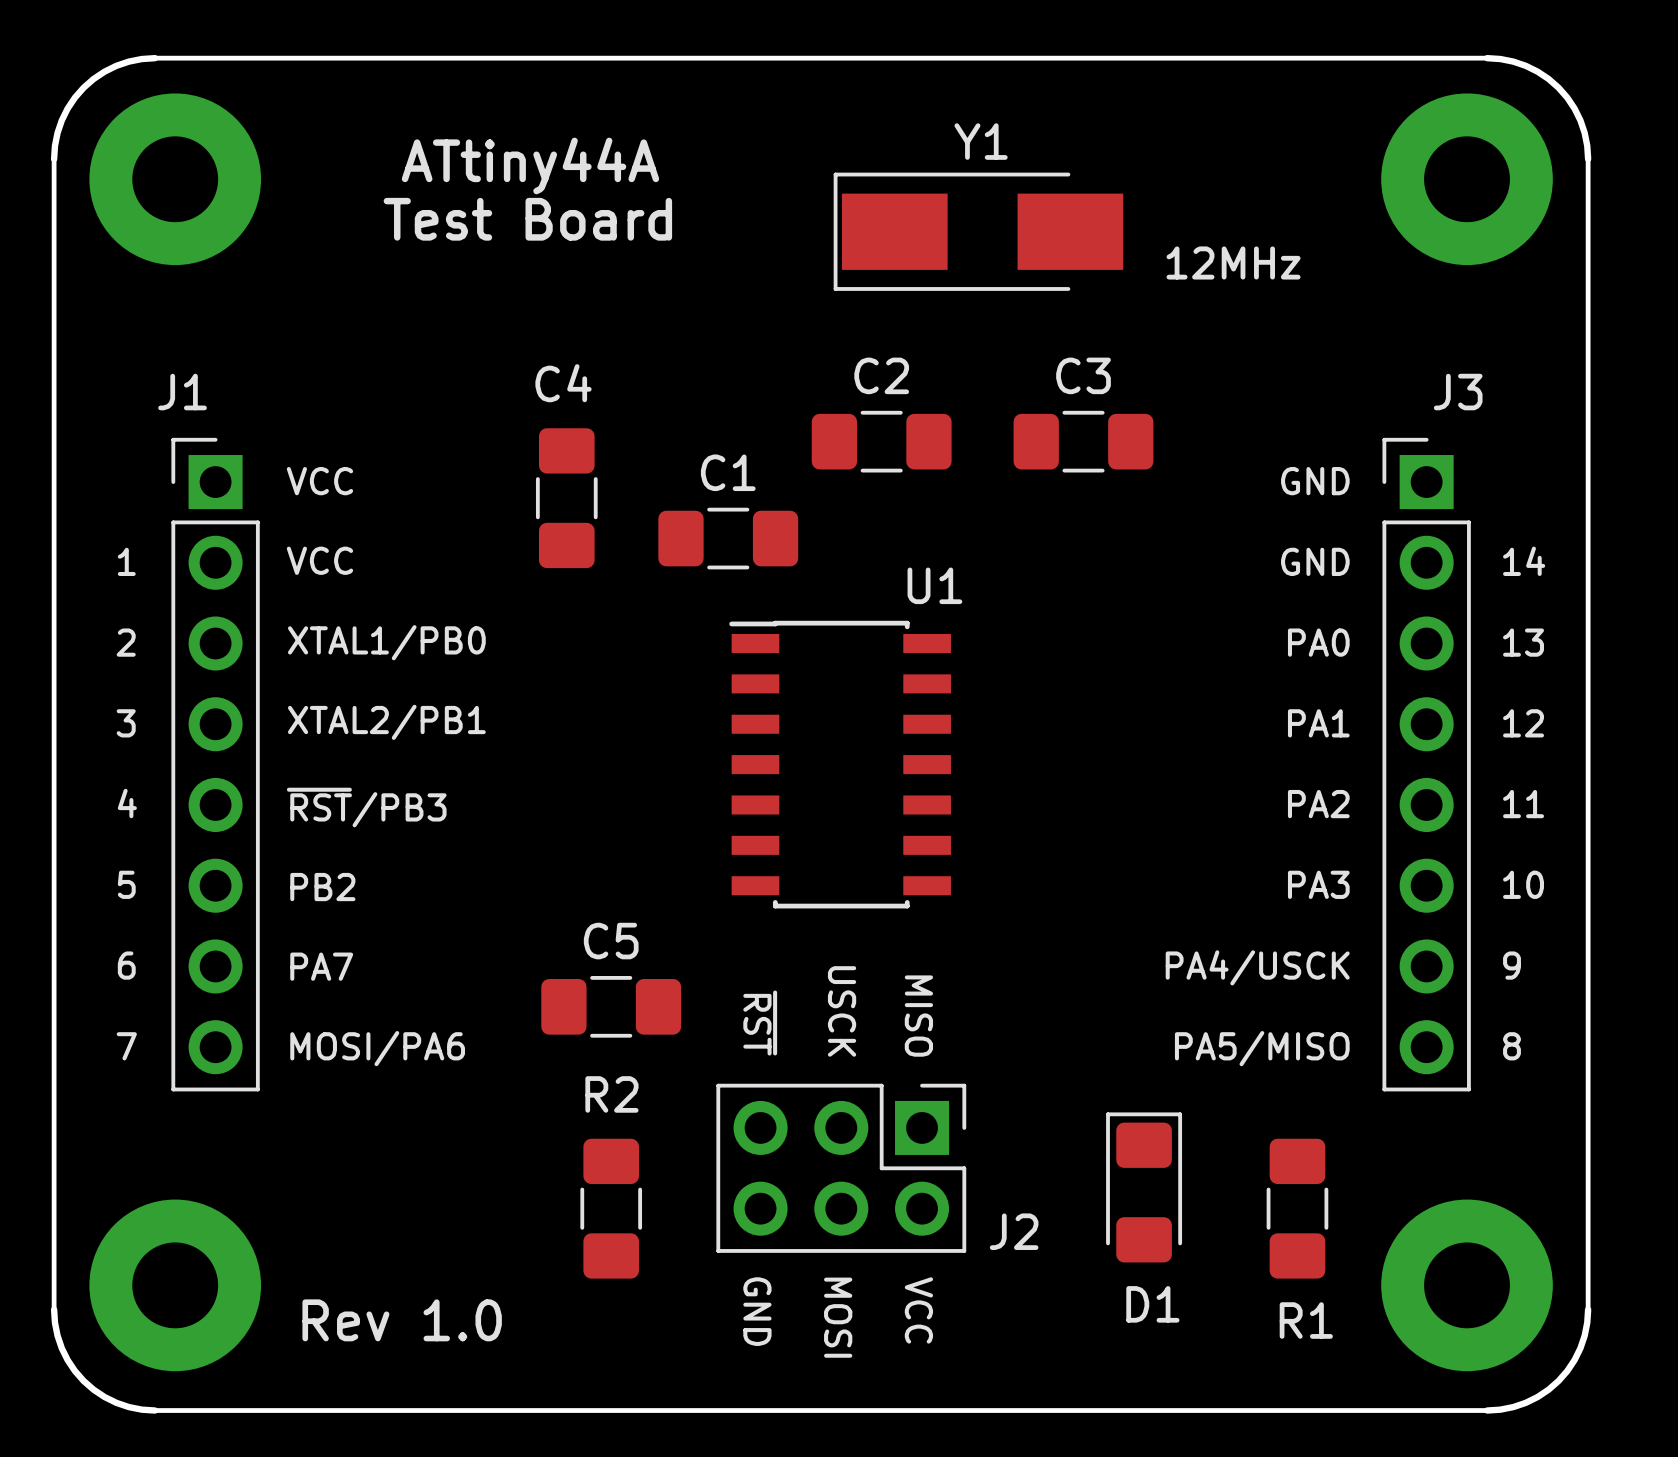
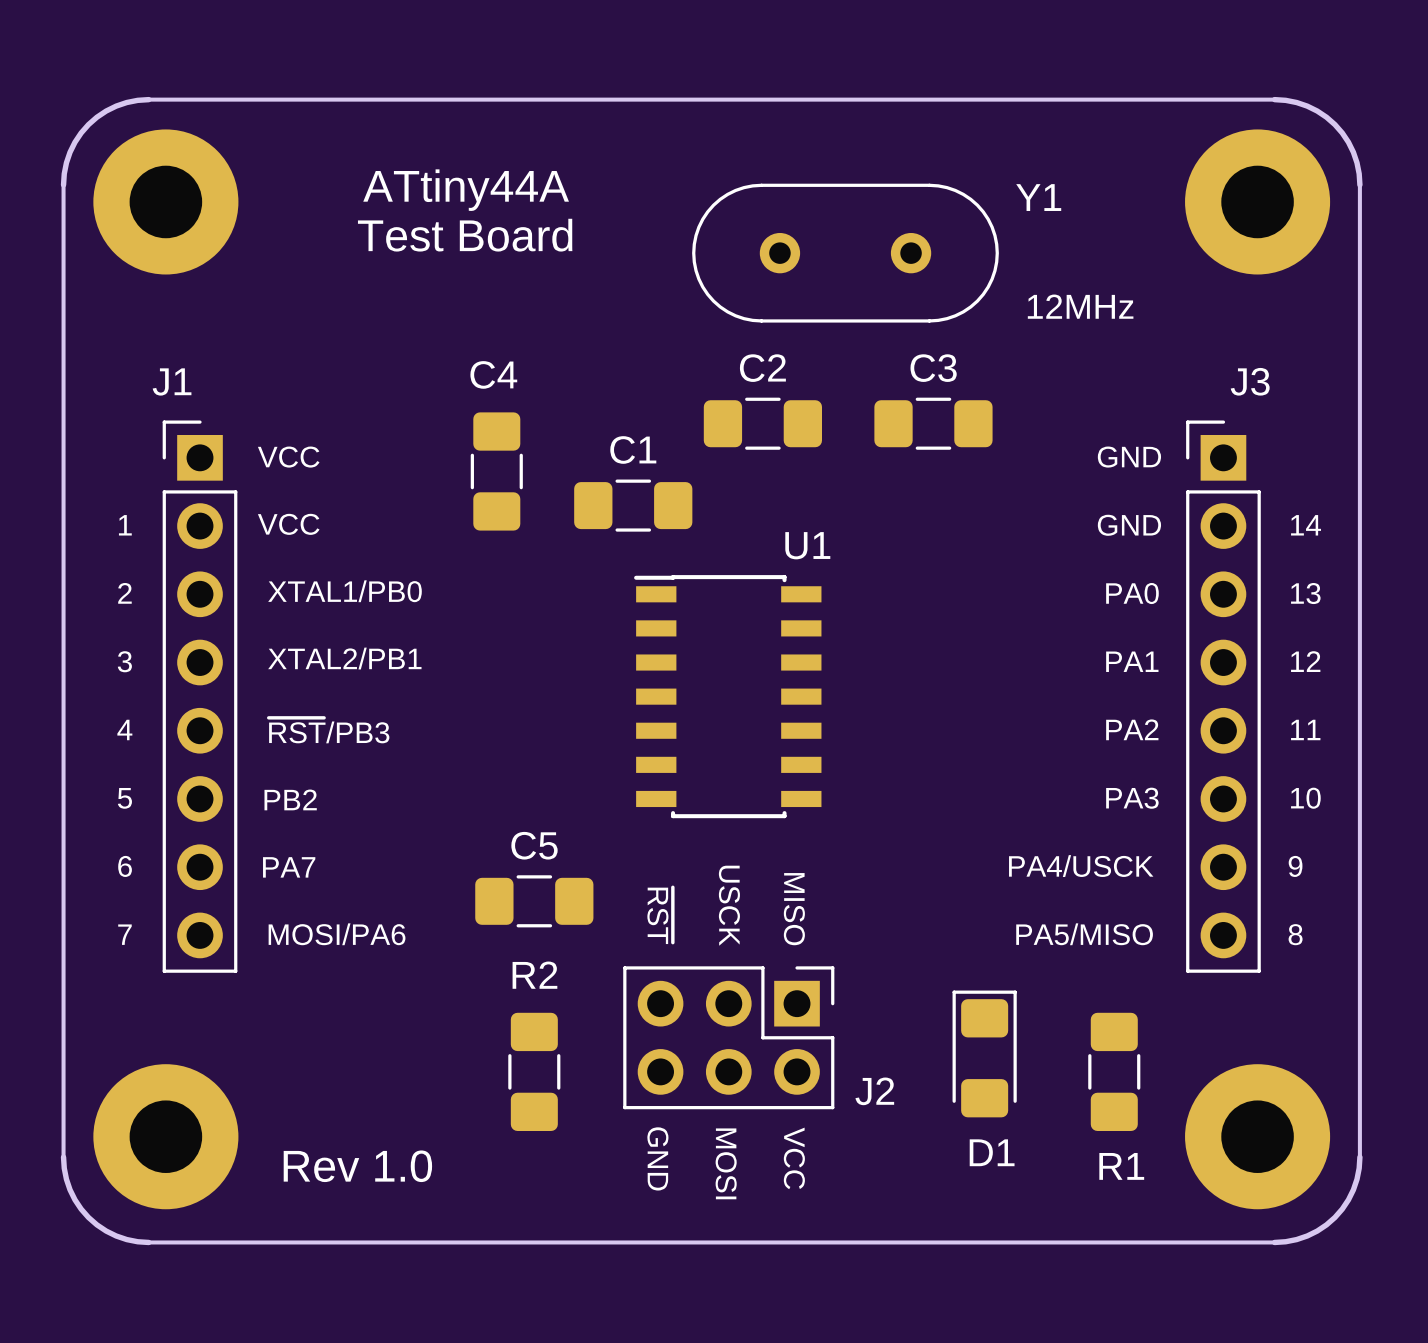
Y1 name position: Y1 (981, 141) -> Y1 (1038, 197)
Y1 footprint: [833, 172, 1124, 291] -> [692, 183, 999, 323]
text position: 12MHz (1233, 262) -> 12MHz (1080, 306)

